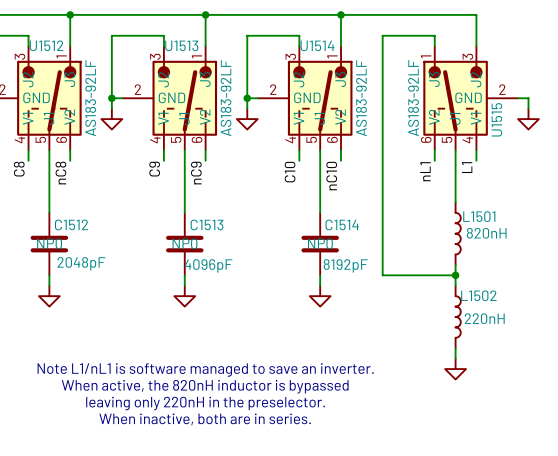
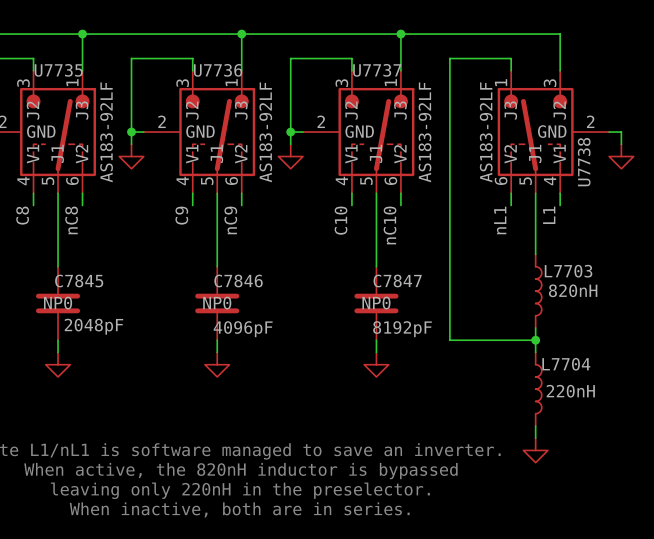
U1512 name: U1512 (46, 45) -> U7735 (58, 70)
U1513 name: U1513 (181, 45) -> U7736 (218, 70)
U1514 name: U1514 (317, 45) -> U7737 (377, 70)
U1515 name: U1515 (496, 119) -> U7738 (584, 162)
L1501 name: L1501 (479, 216) -> L7703 (568, 271)
C1512 name: C1512 (71, 224) -> C7845 (79, 280)
C1513 name: C1513 (207, 224) -> C7846 (238, 280)
C1514 name: C1514 (342, 224) -> C7847 (397, 280)
L1502 name: L1502 (478, 295) -> L7704 (566, 364)

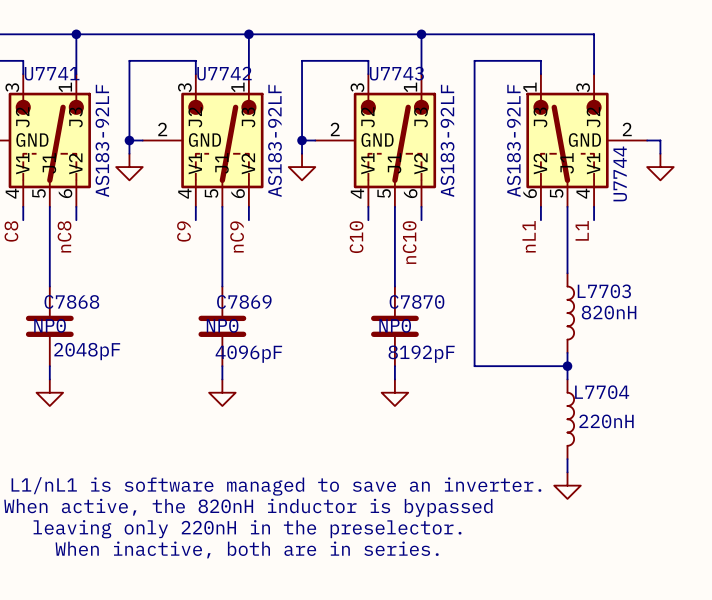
U7735 name: U7735 (58, 70) -> U7741 (52, 73)
U7736 name: U7736 (218, 70) -> U7742 (224, 73)
U7737 name: U7737 (377, 70) -> U7743 (396, 73)
U7738 name: U7738 (584, 162) -> U7744 (620, 173)
C7845 name: C7845 (79, 280) -> C7868 (71, 301)
C7846 name: C7846 (238, 280) -> C7869 (244, 301)
C7847 name: C7847 (397, 280) -> C7870 (416, 301)

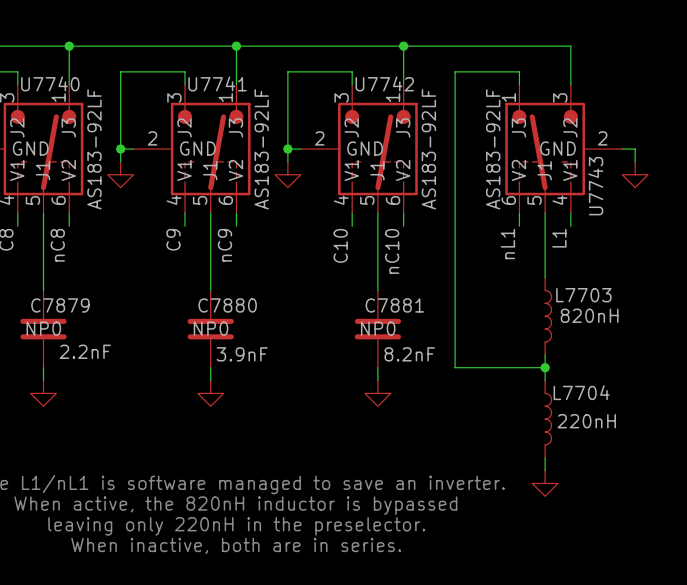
U7741 name: U7741 (52, 73) -> U7740 (50, 83)
U7742 name: U7742 (224, 73) -> U7741 (217, 83)
U7743 name: U7743 (396, 73) -> U7742 (384, 83)
U7744 name: U7744 (620, 173) -> U7743 (595, 186)
C7868 name: C7868 (71, 301) -> C7879 (60, 305)
C7869 name: C7869 (244, 301) -> C7880 (227, 305)
C7870 name: C7870 (416, 301) -> C7881 (394, 305)
C7868 value: 2048pF (87, 351) -> 2.2nF (85, 351)
C7869 value: 4096pF (248, 354) -> 3.9nF (242, 354)
C7870 value: 8192pF (421, 354) -> 8.2nF (409, 354)

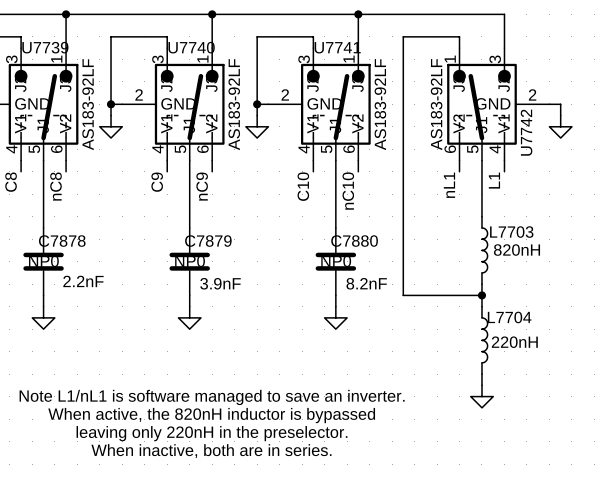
U7740 name: U7740 (50, 83) -> U7739 (45, 47)
U7741 name: U7741 (217, 83) -> U7740 (191, 47)
U7742 name: U7742 (384, 83) -> U7741 (337, 47)
U7743 name: U7743 (595, 186) -> U7742 (526, 132)
C7879 name: C7879 (60, 305) -> C7878 (62, 241)
C7880 name: C7880 (227, 305) -> C7879 (208, 241)
C7881 name: C7881 (394, 305) -> C7880 (354, 241)

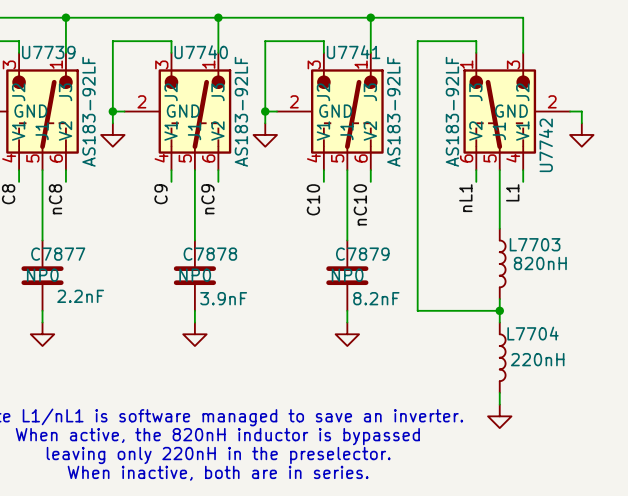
C7878 name: C7878 (62, 241) -> C7877 (58, 254)
C7879 name: C7879 (208, 241) -> C7878 (210, 254)
C7880 name: C7880 (354, 241) -> C7879 (362, 254)

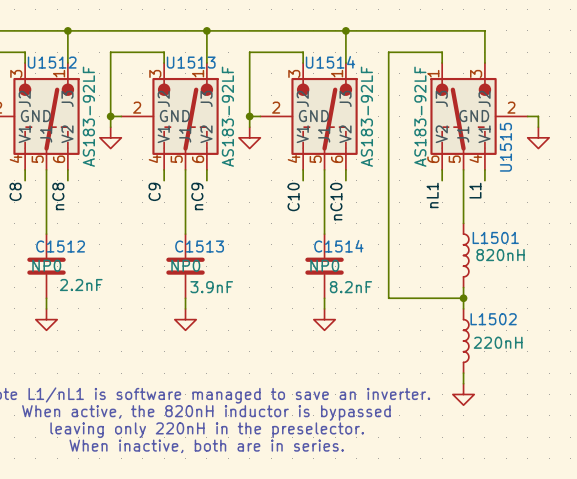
U7739 name: U7739 (48, 52) -> U1512 (52, 62)
U7740 name: U7740 (201, 52) -> U1513 (191, 62)
U7741 name: U7741 (353, 52) -> U1514 (330, 62)
U7742 name: U7742 (545, 145) -> U1515 (505, 147)
L7703 name: L7703 (535, 244) -> L1501 (495, 237)
C7877 name: C7877 (58, 254) -> C1512 (60, 246)
C7878 name: C7878 (210, 254) -> C1513 (199, 246)
C7879 name: C7879 (362, 254) -> C1514 (338, 246)
L7704 name: L7704 (533, 333) -> L1502 (493, 319)

